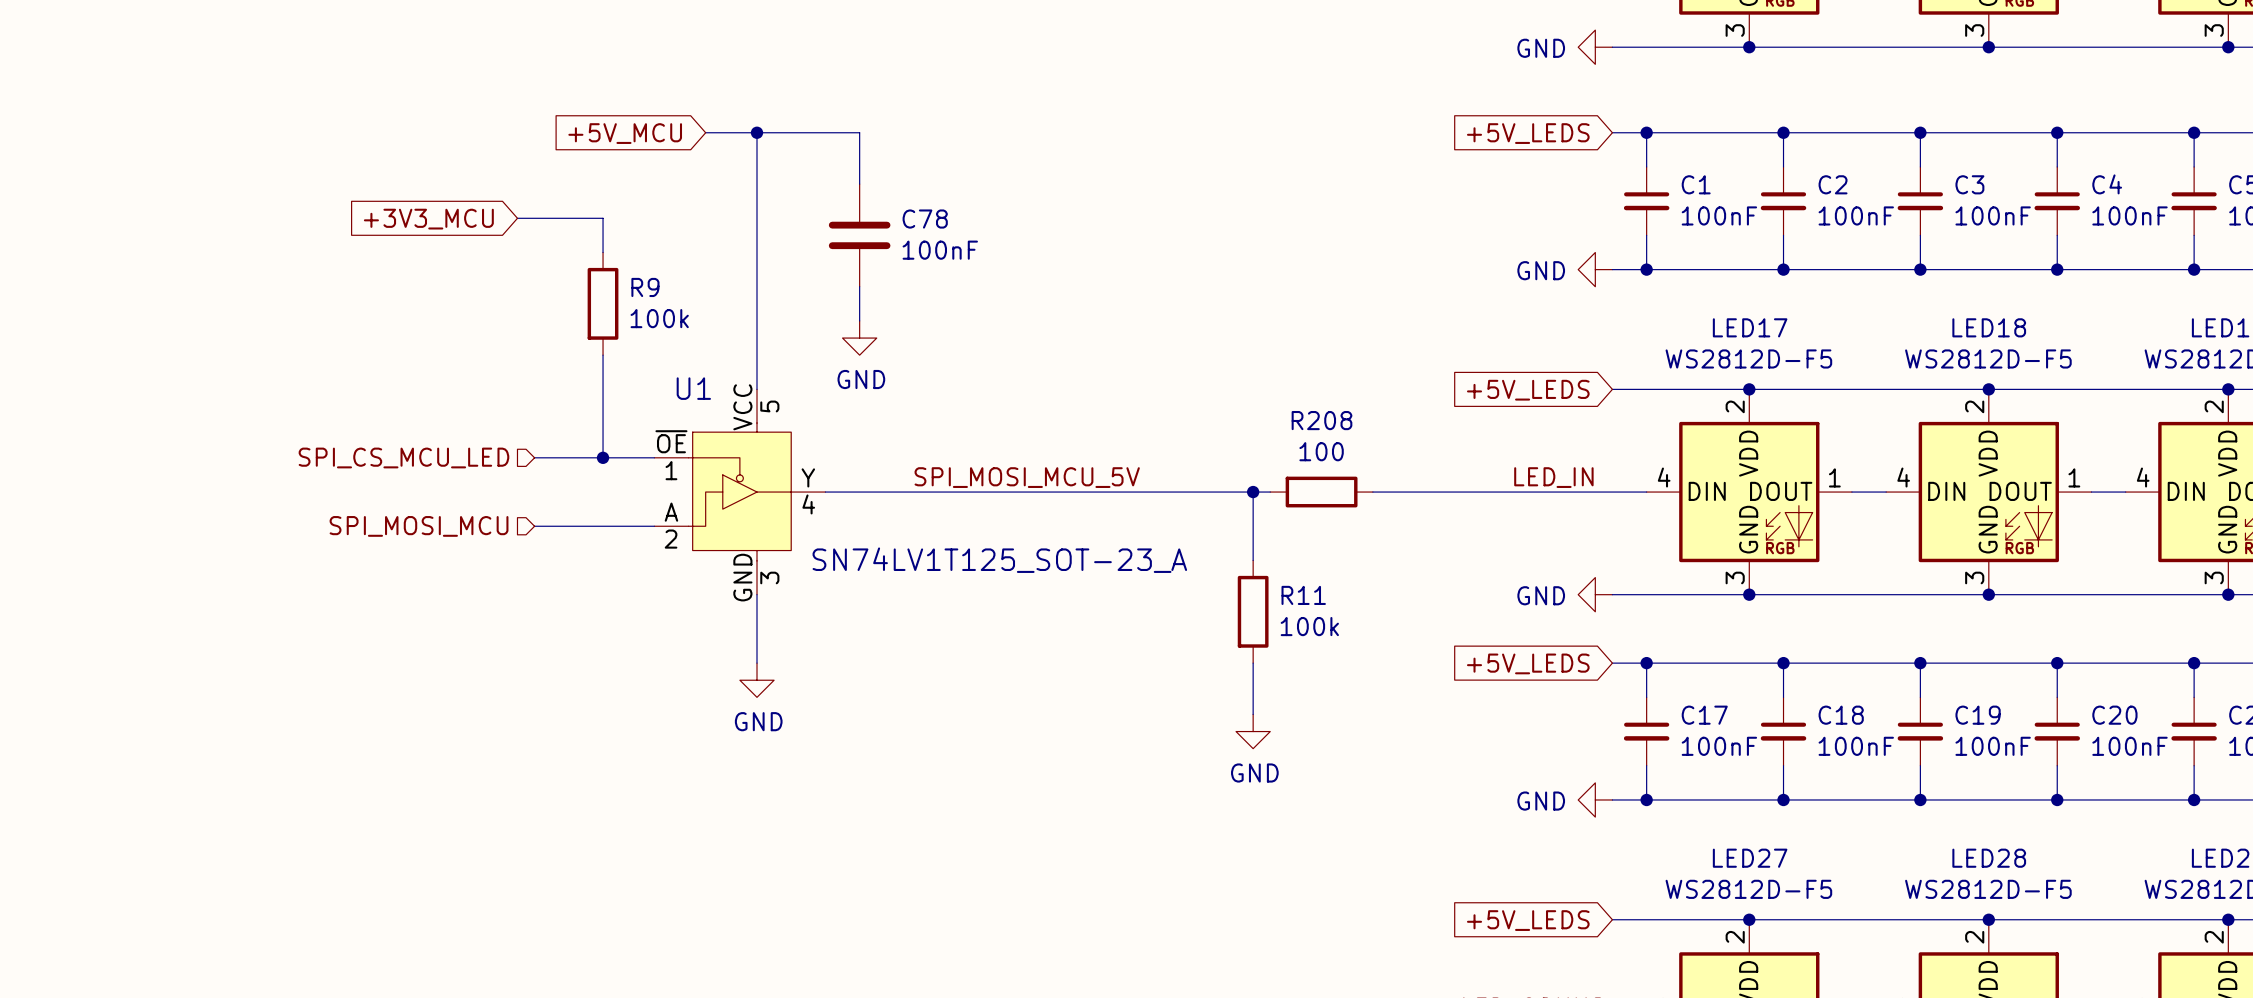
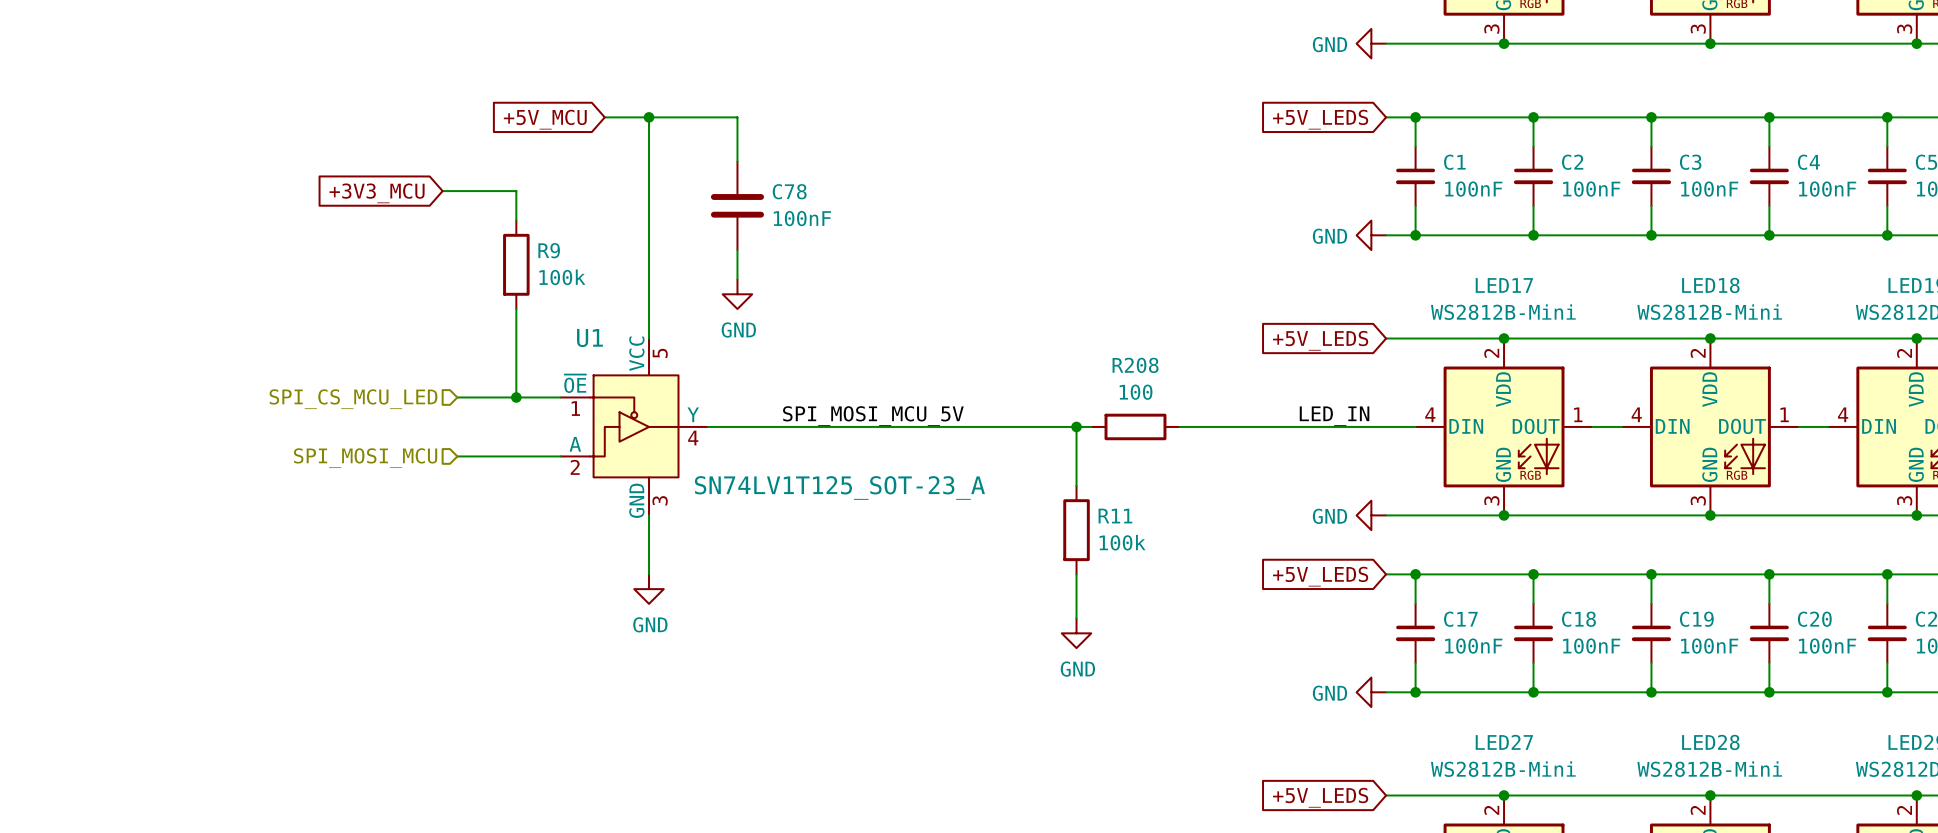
LED17 value: WS2812D-F5 (1748, 358) -> WS2812B-Mini (1503, 312)
LED18 value: WS2812D-F5 (1988, 358) -> WS2812B-Mini (1709, 312)
LED27 value: WS2812D-F5 (1748, 889) -> WS2812B-Mini (1503, 769)
LED28 value: WS2812D-F5 (1988, 889) -> WS2812B-Mini (1709, 769)

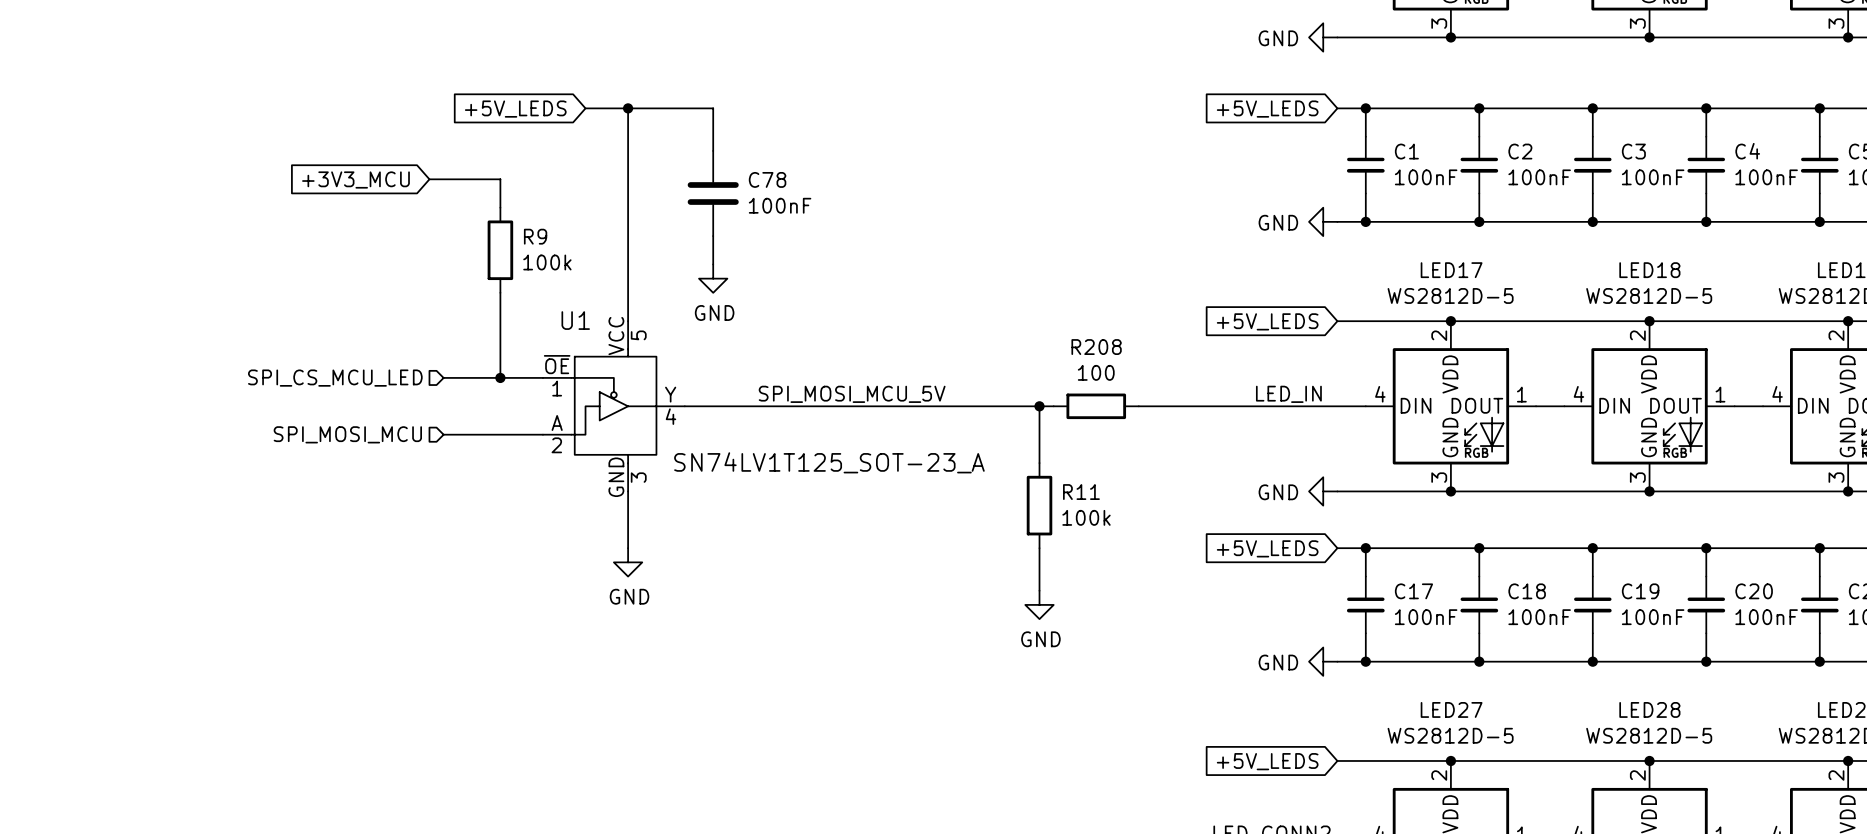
global label: +5V_MCU (545, 119) -> +5V_LEDS (515, 109)
LED17 value: WS2812B-Mini (1503, 312) -> WS2812D-5 (1450, 295)
LED18 value: WS2812B-Mini (1709, 312) -> WS2812D-5 (1649, 295)
LED27 value: WS2812B-Mini (1503, 769) -> WS2812D-5 (1450, 735)
LED28 value: WS2812B-Mini (1709, 769) -> WS2812D-5 (1649, 735)

